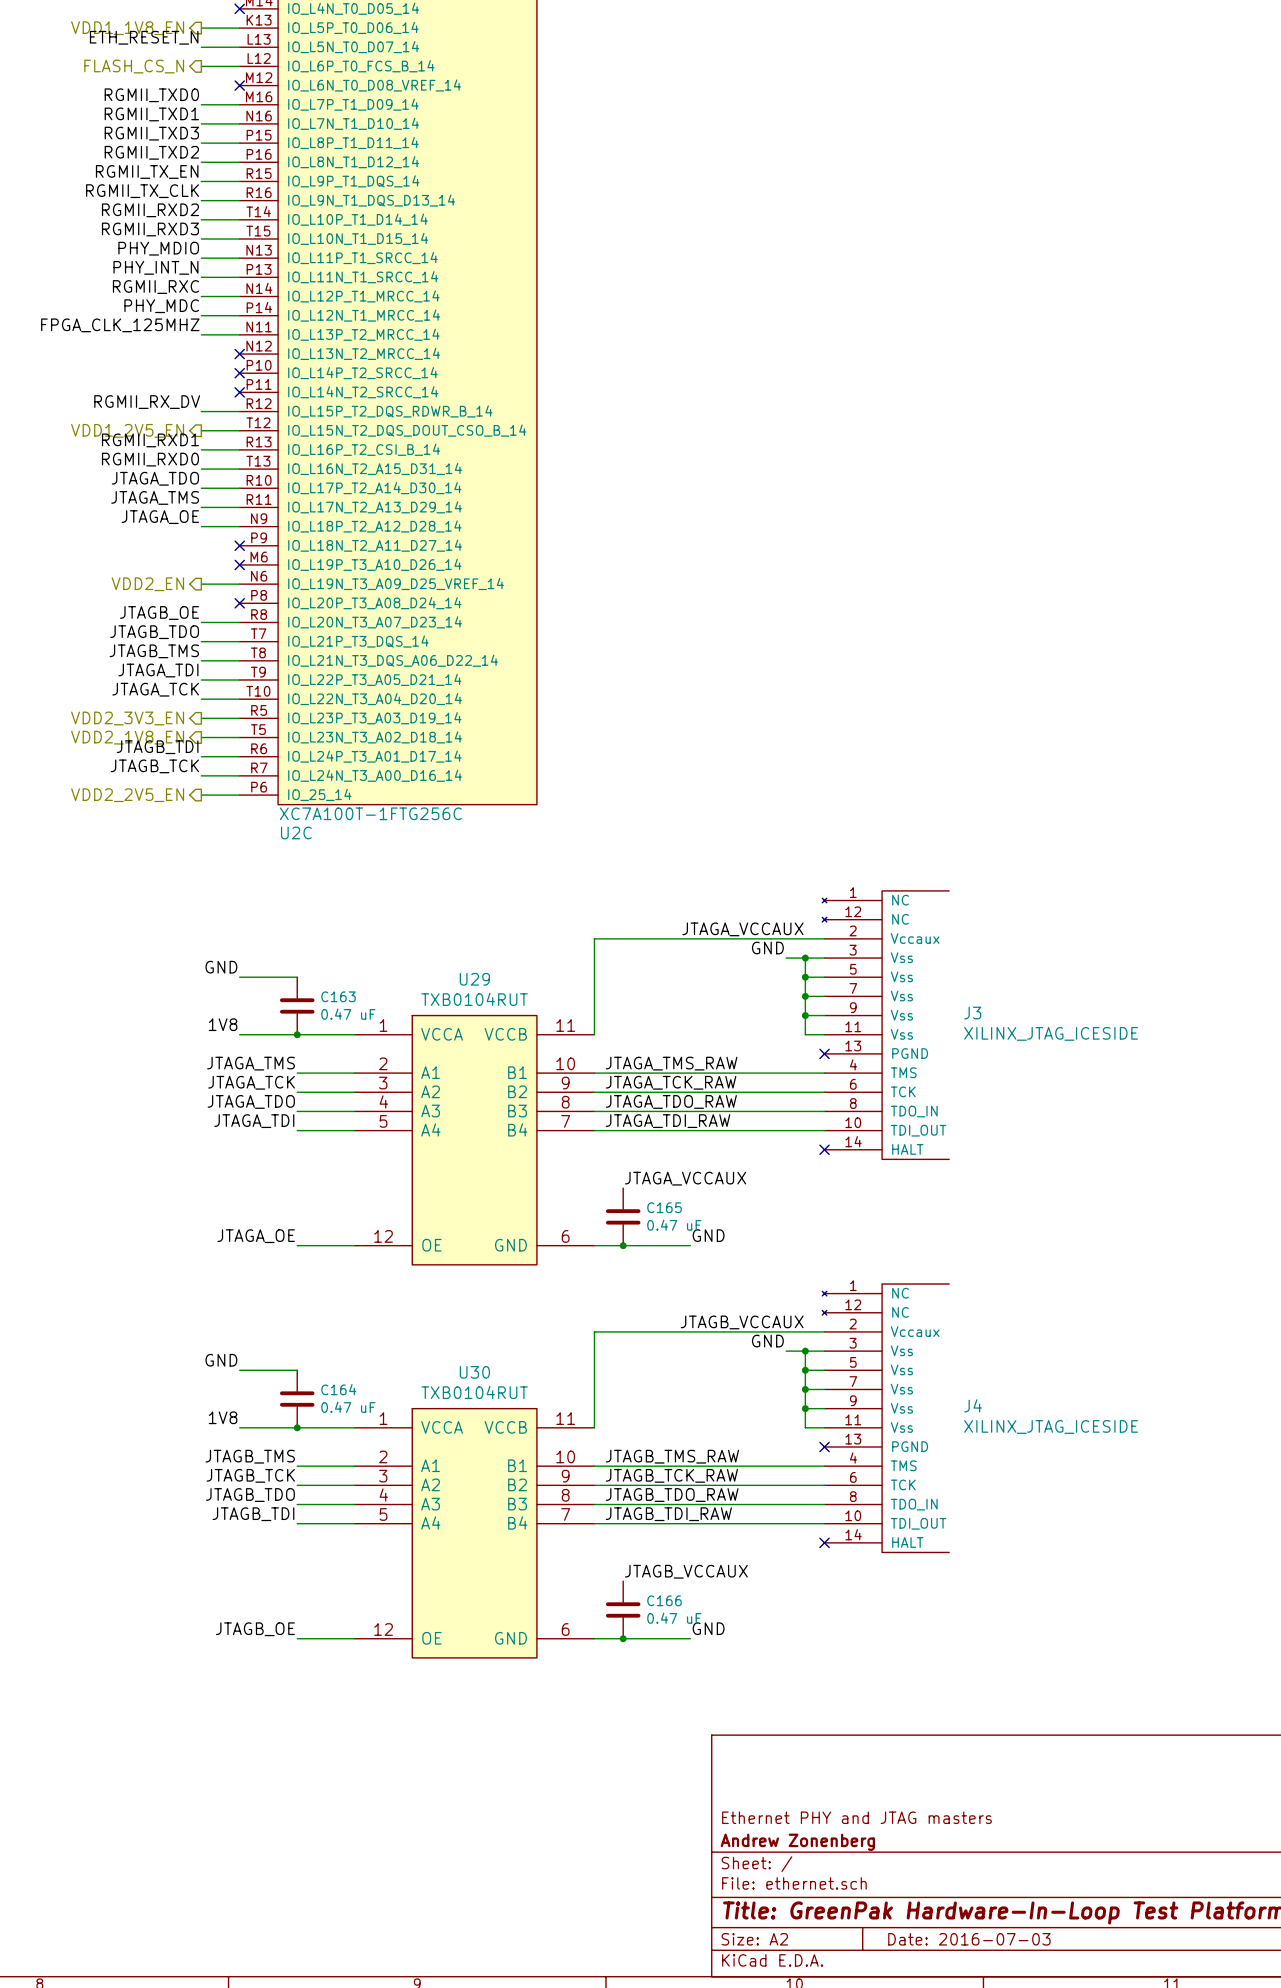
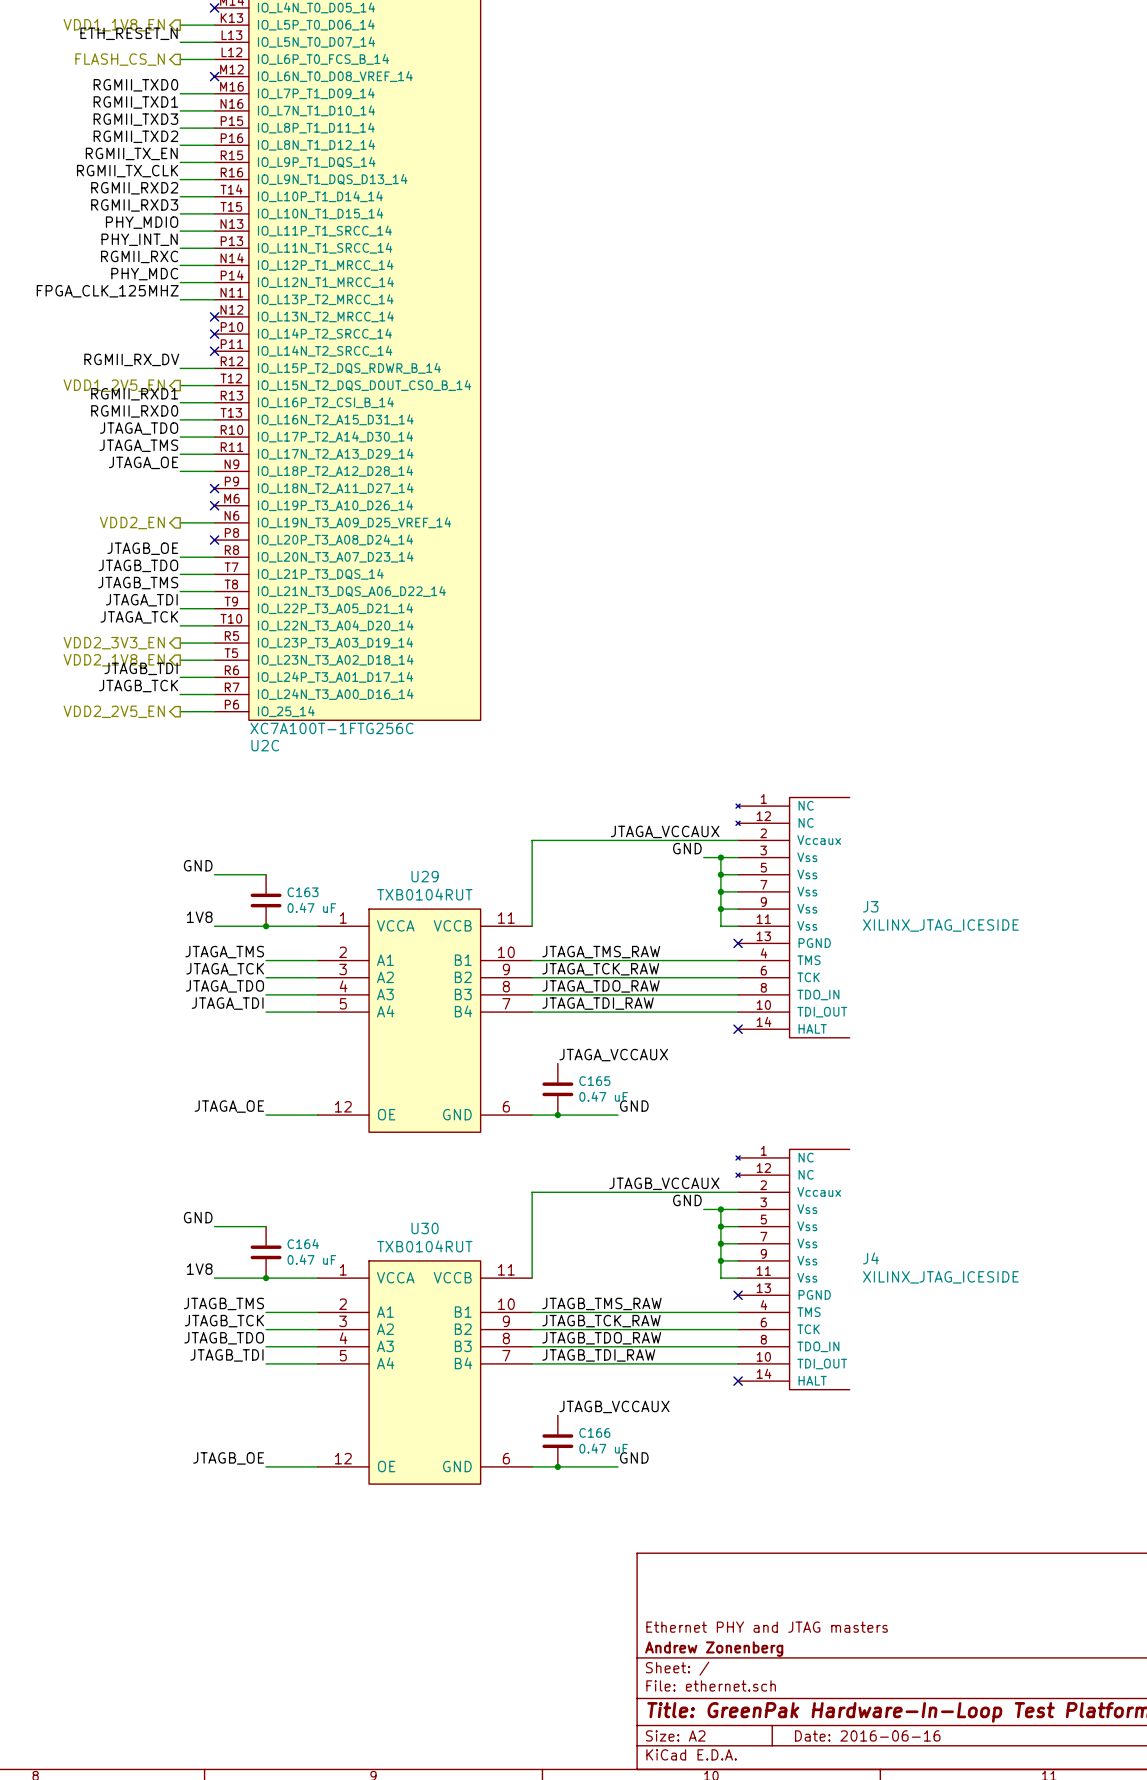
title block: Date: 2016-07-03 (969, 1939) -> Date: 2016-06-16 (867, 1735)

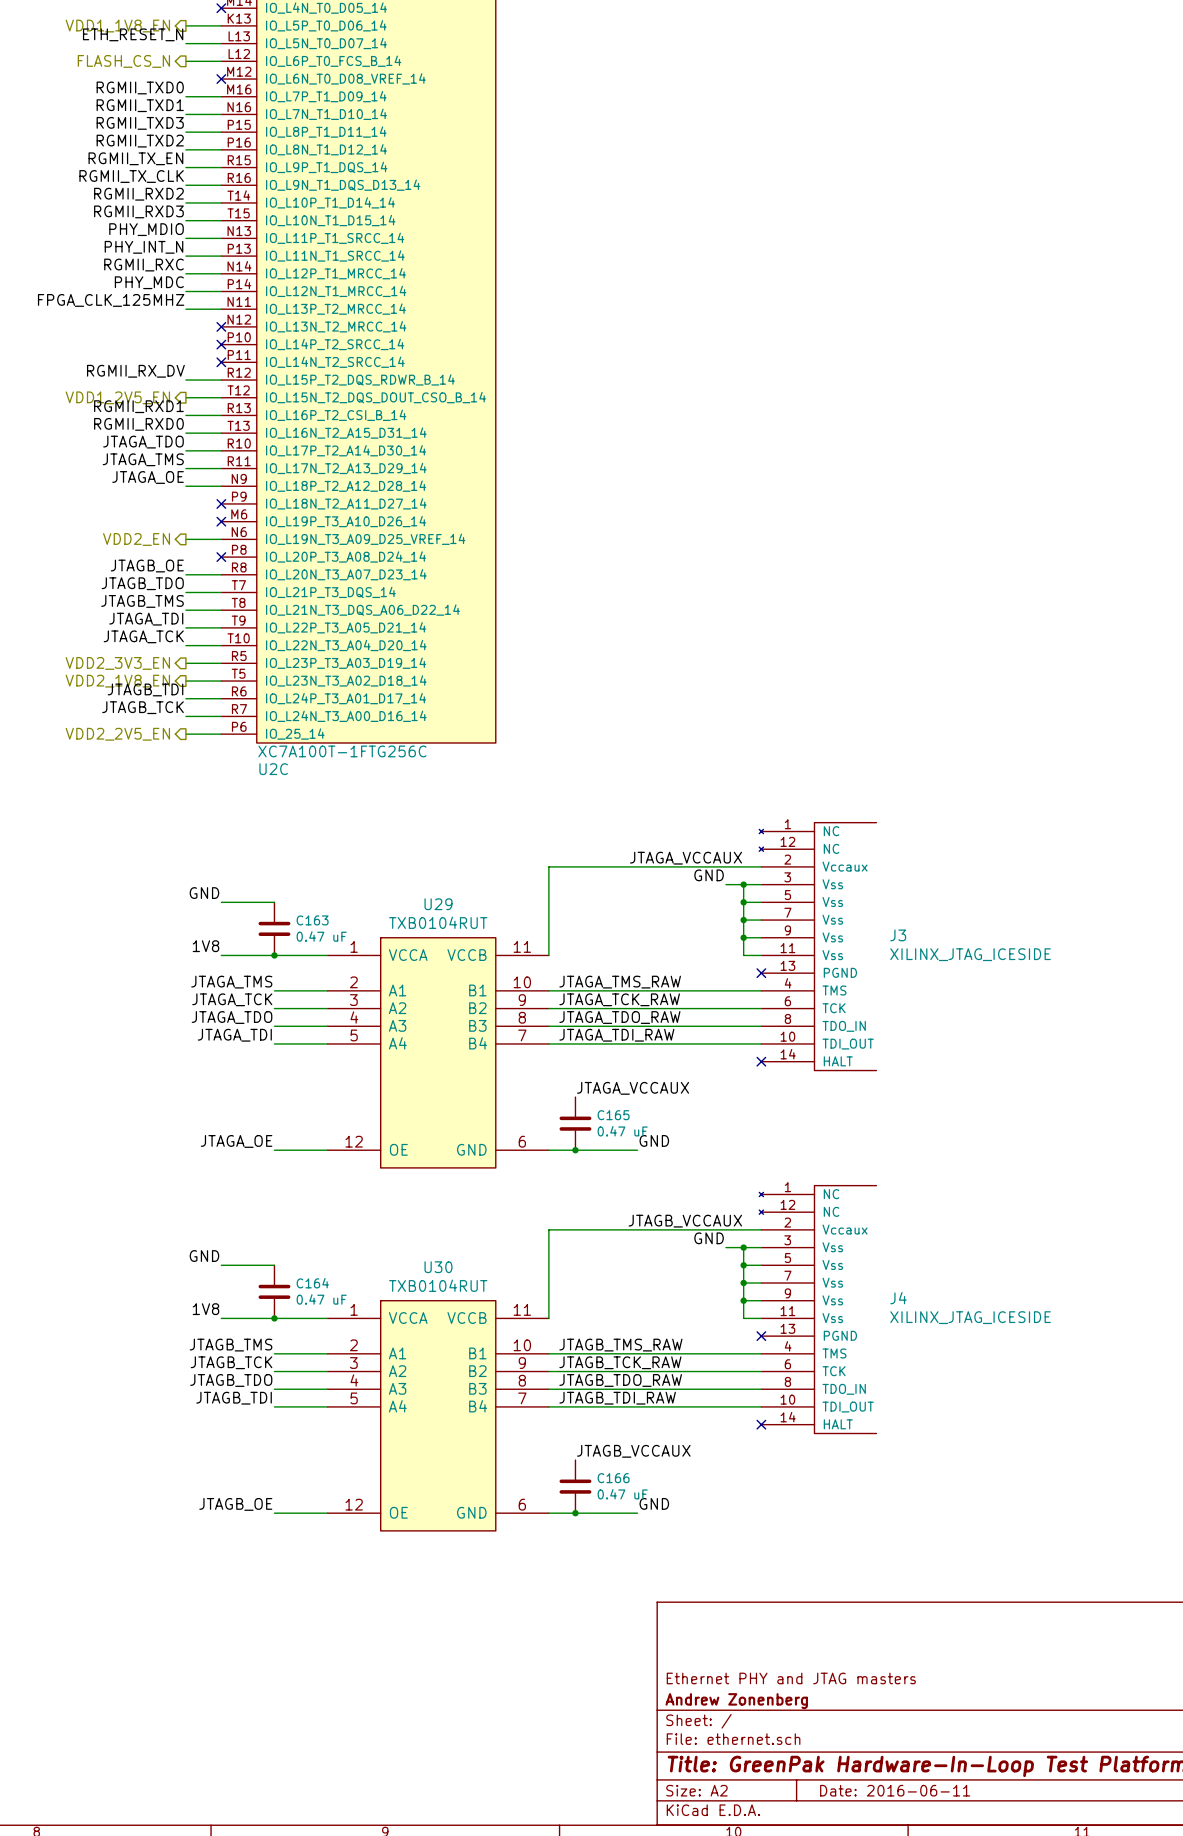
title block: Date: 2016-06-16 (867, 1735) -> Date: 2016-06-11 (895, 1790)

